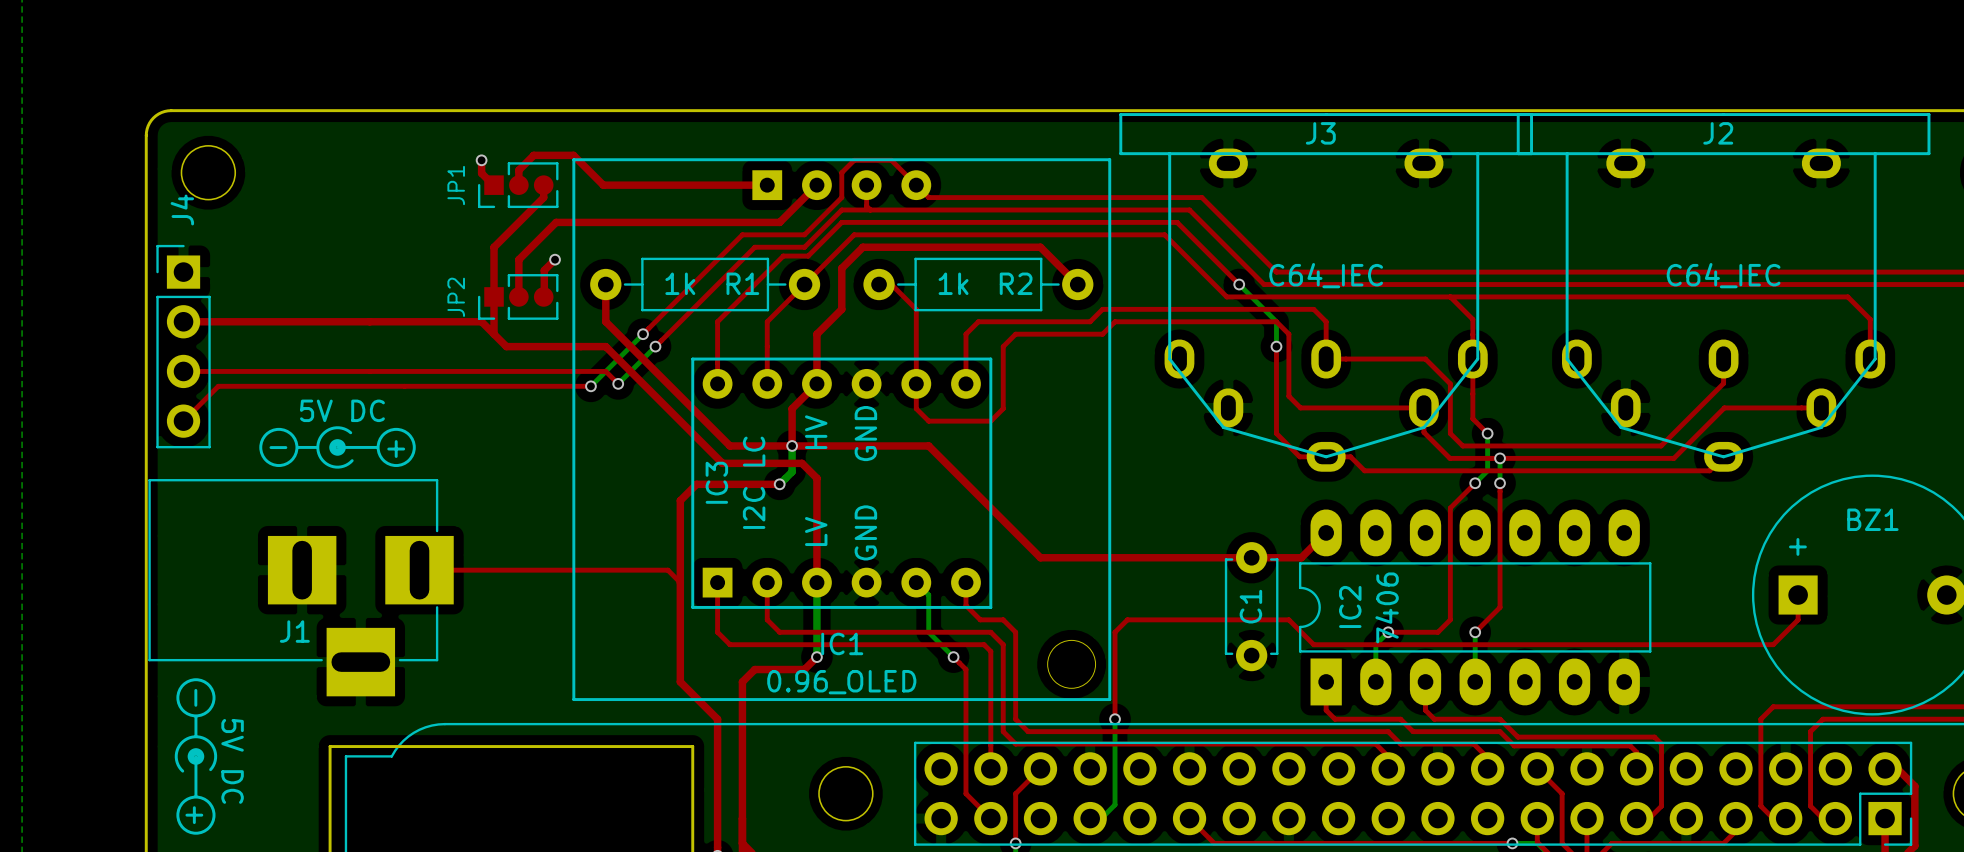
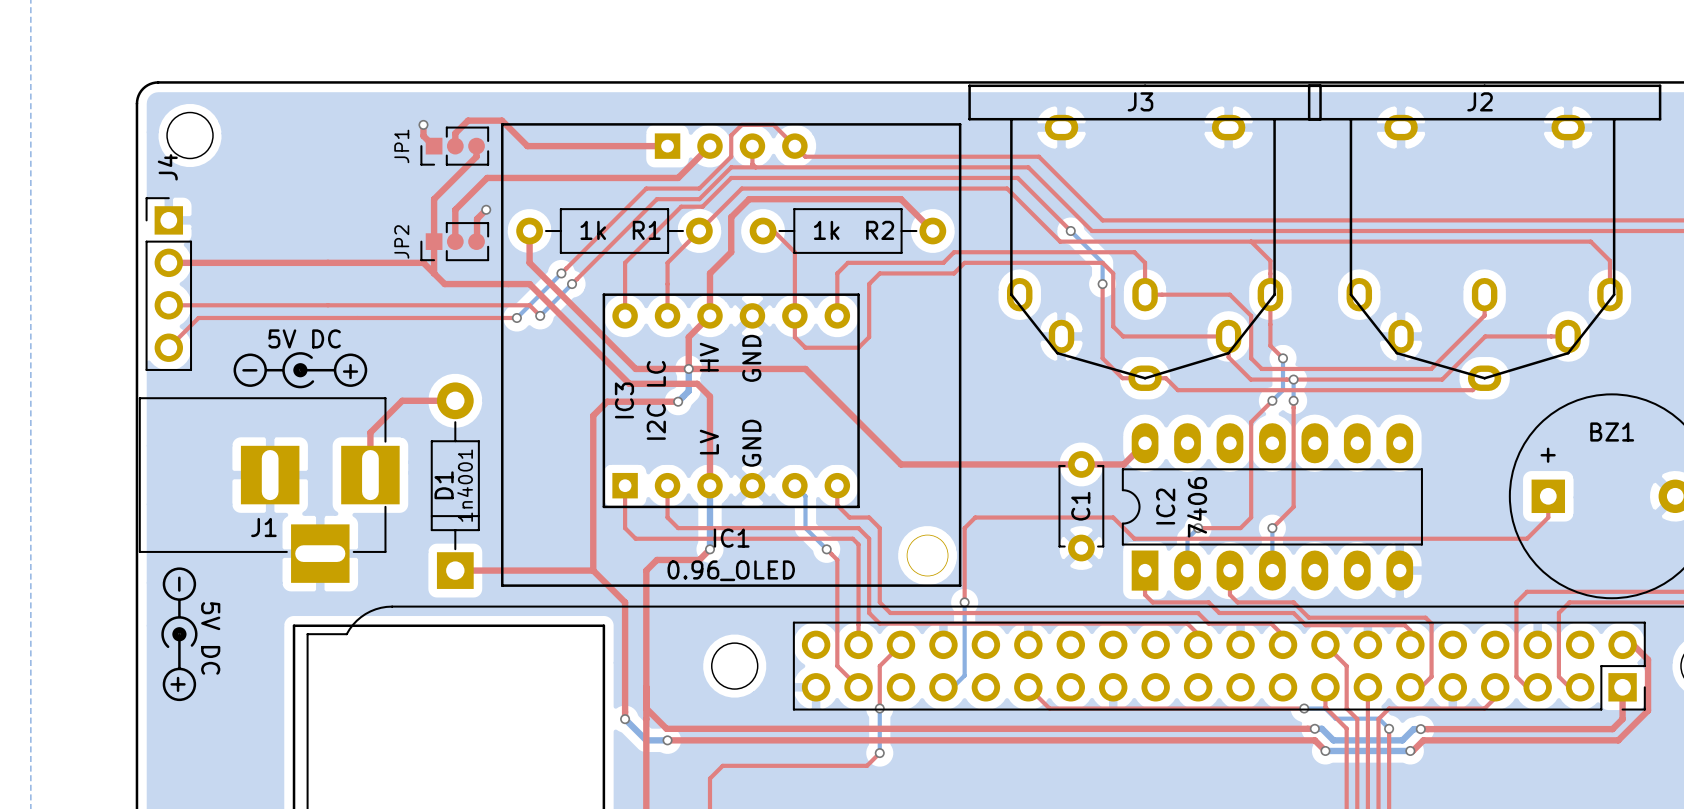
J3 value: C64_IEC (1326, 275) -> none
J2 value: C64_IEC (1723, 275) -> none
top track: (419, 570) (667, 570) (680, 582) -> (370, 475) (370, 432) (402, 400) (455, 400)
D1: none -> 1n4001 (455, 485)
top track: none -> (455, 570) (593, 570)

